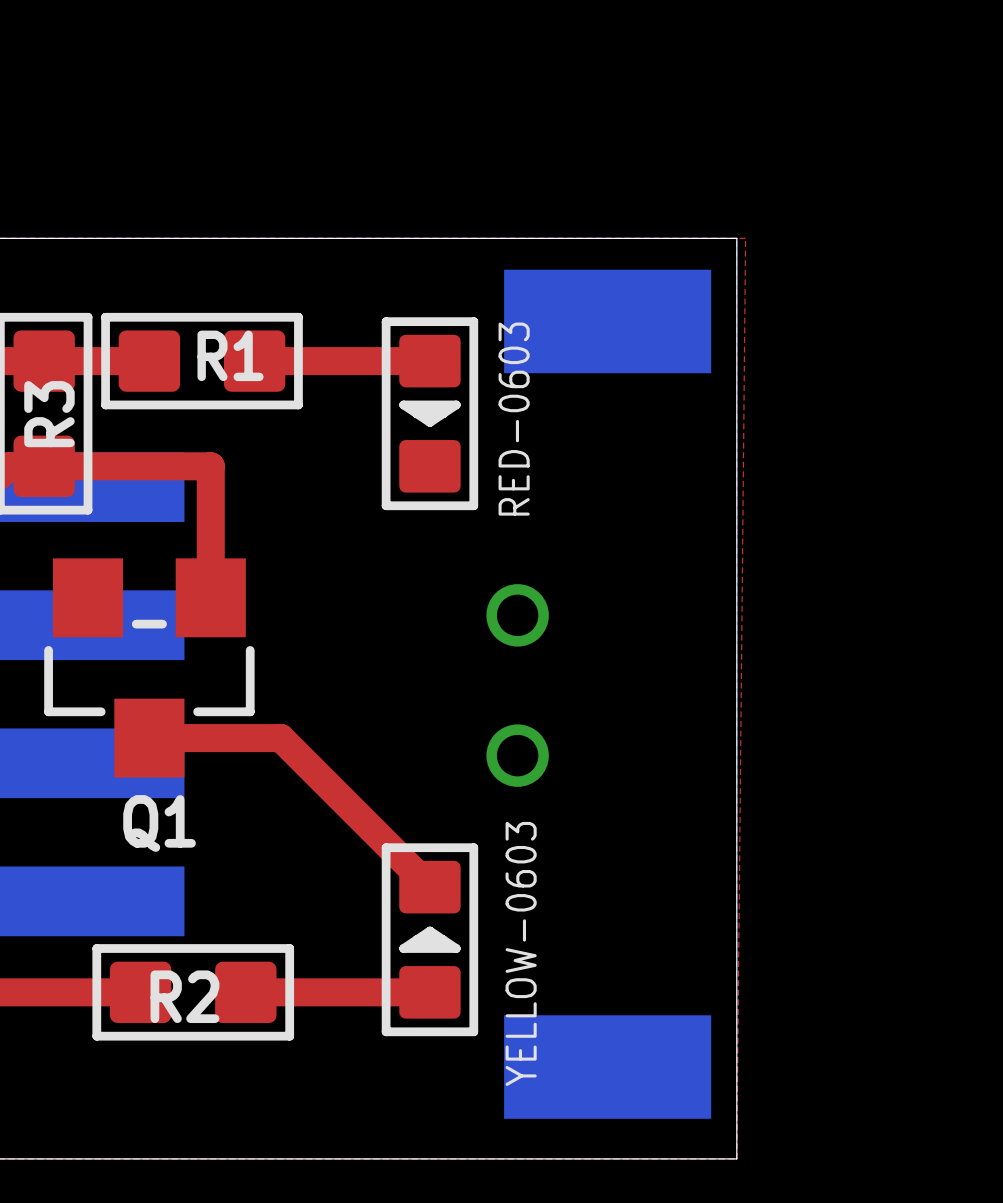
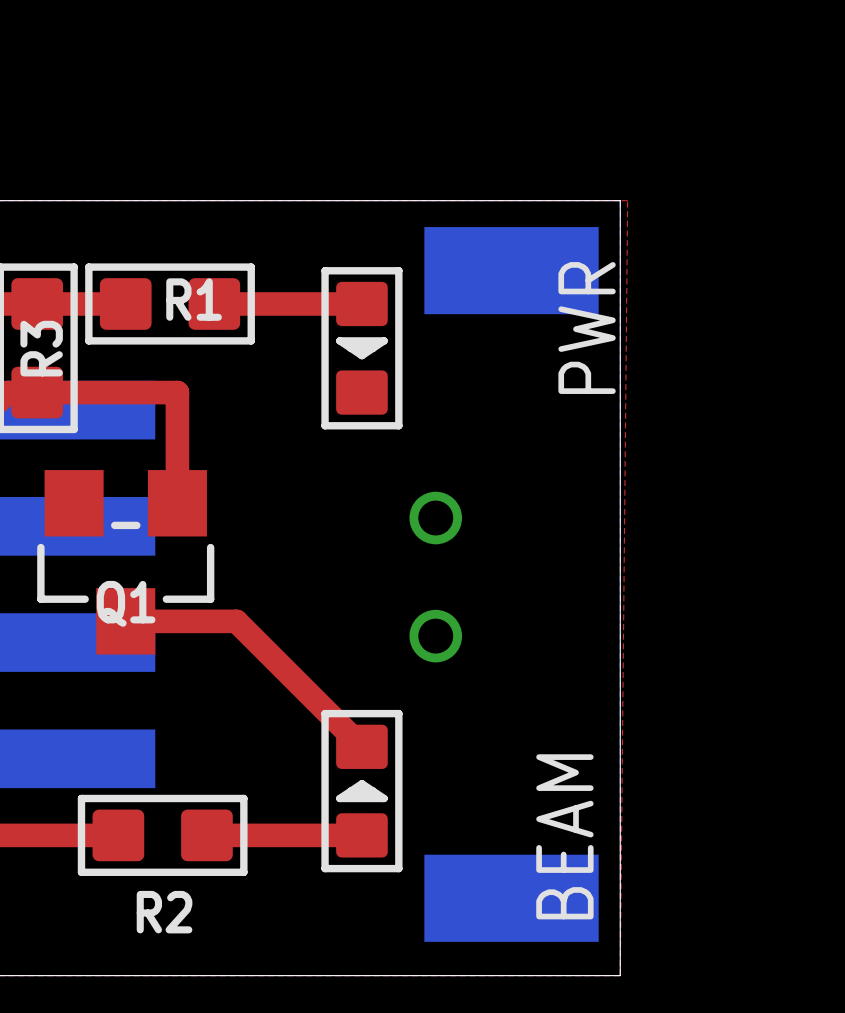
RED-0603 name: RED-0603 (514, 419) -> PWR (587, 328)
Q1 name position: Q1 (159, 823) -> Q1 (126, 603)
YELLOW-0603 name: YELLOW-0603 (521, 953) -> BEAM (564, 836)
R2 name position: R2 (184, 996) -> R2 (164, 912)

